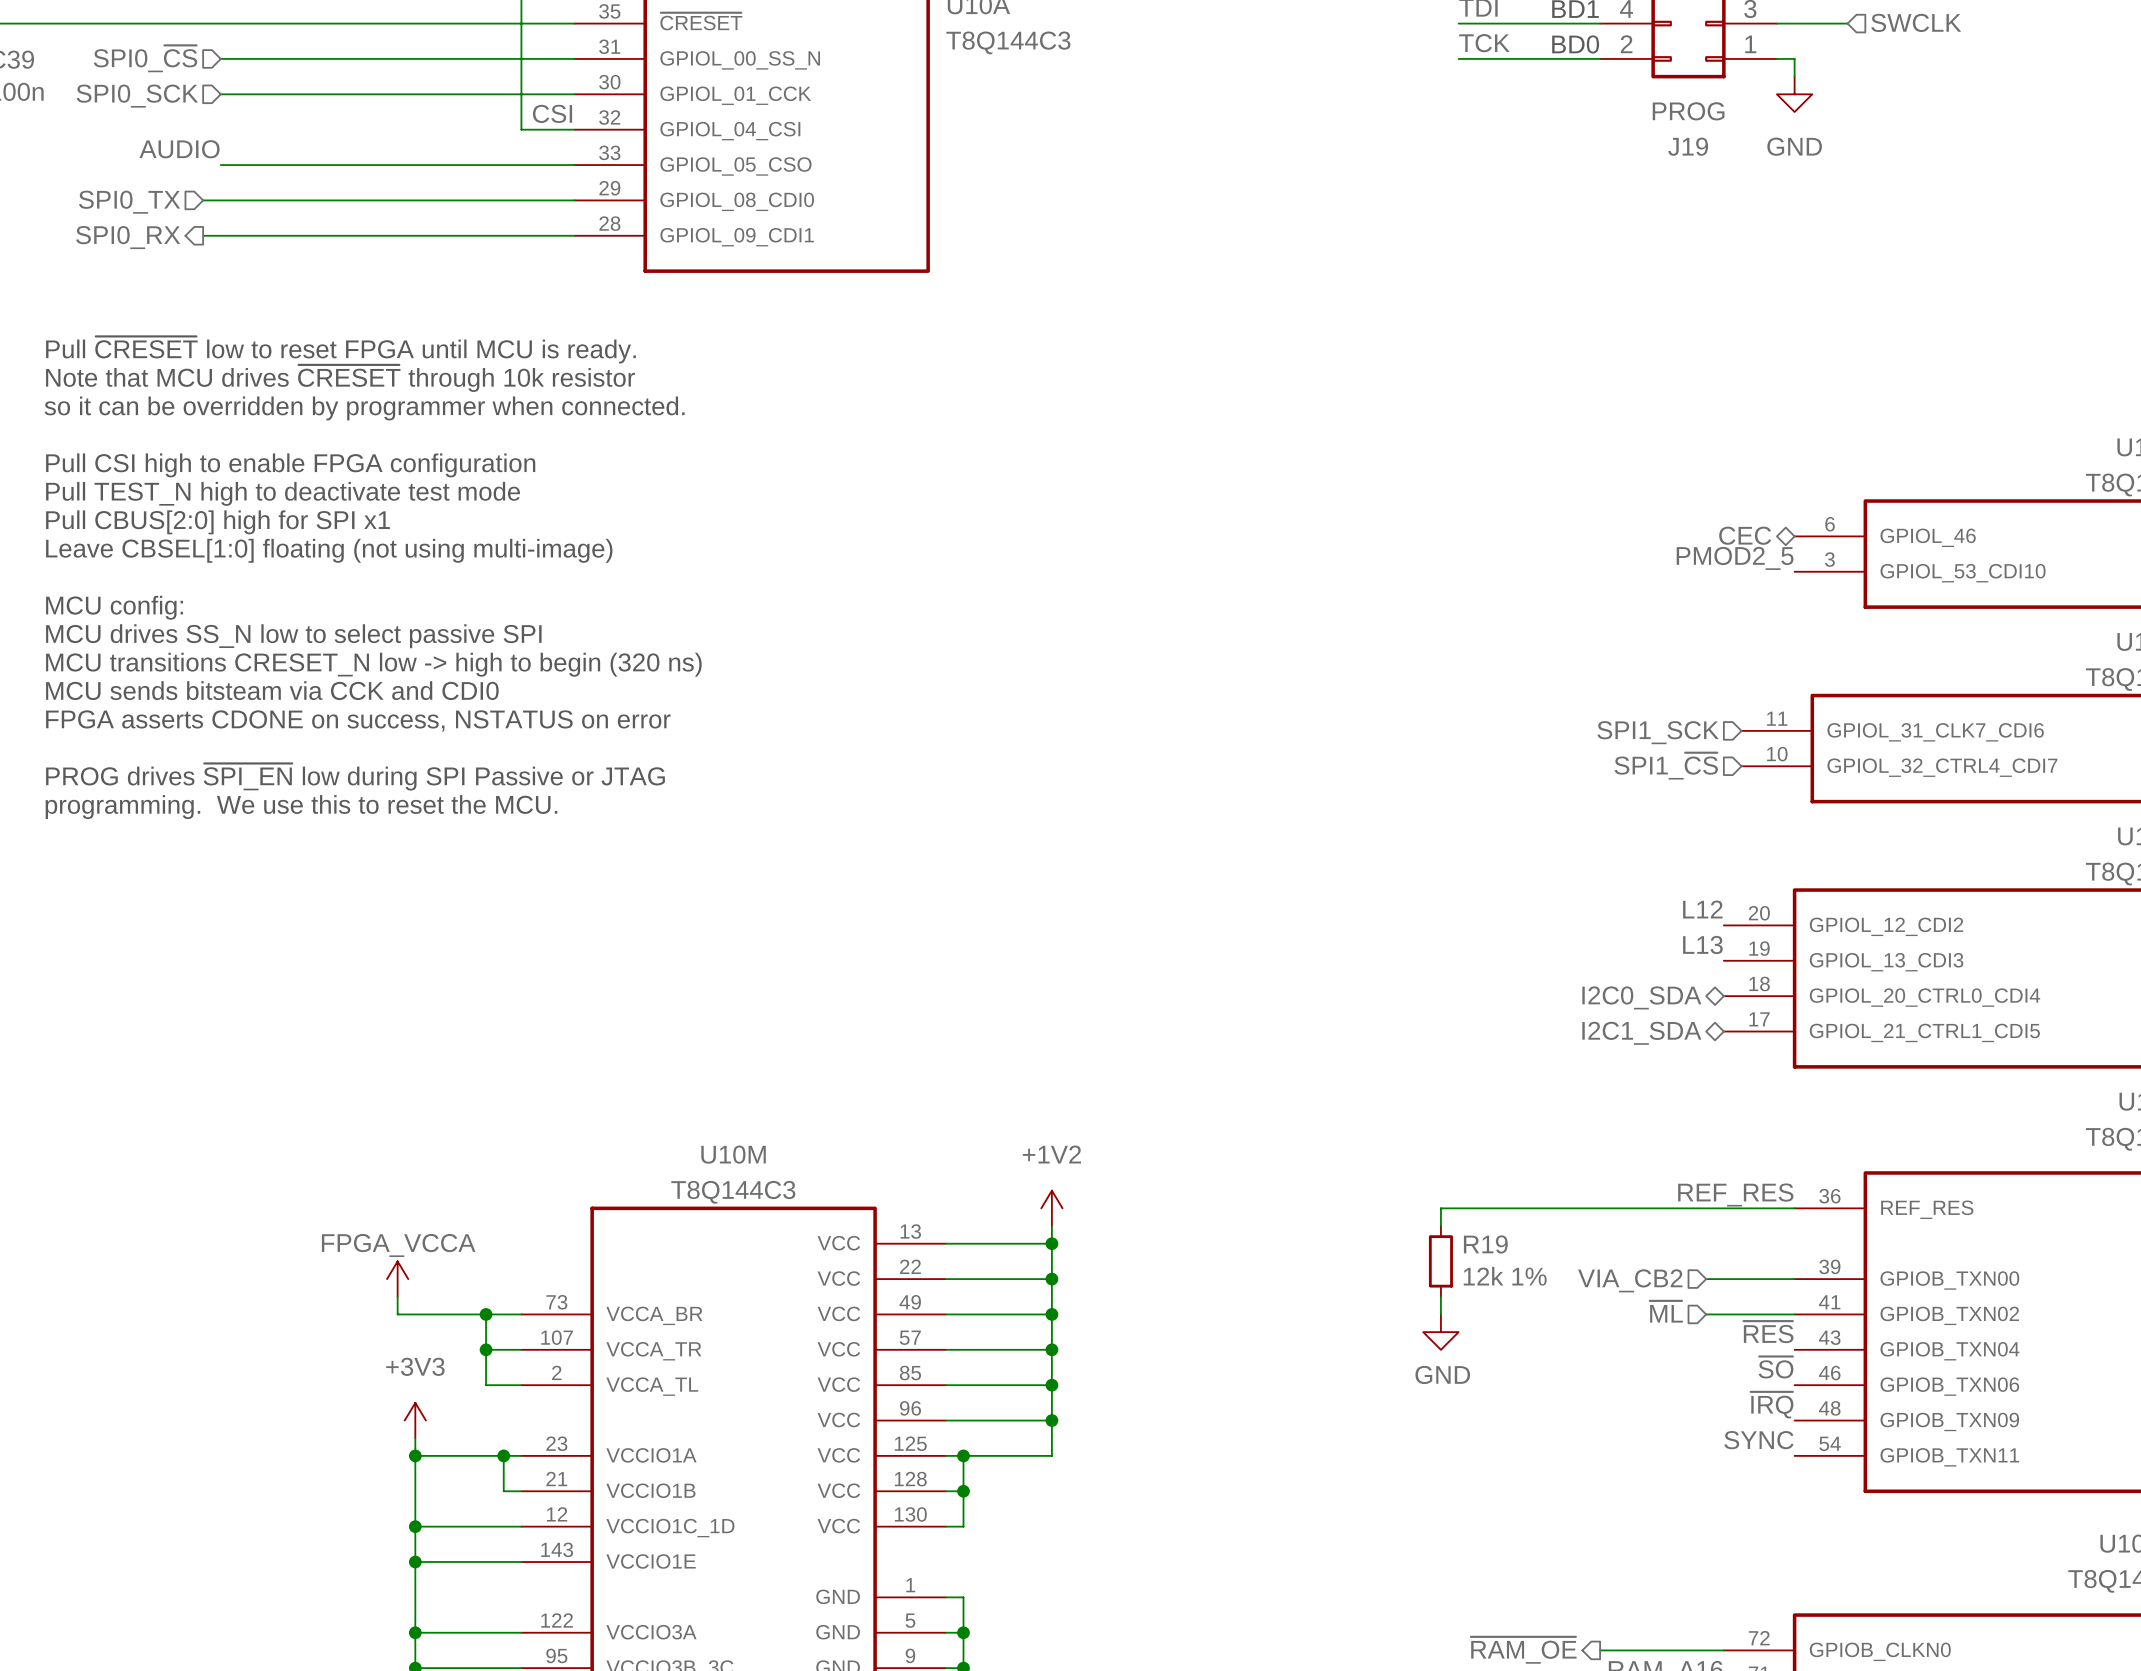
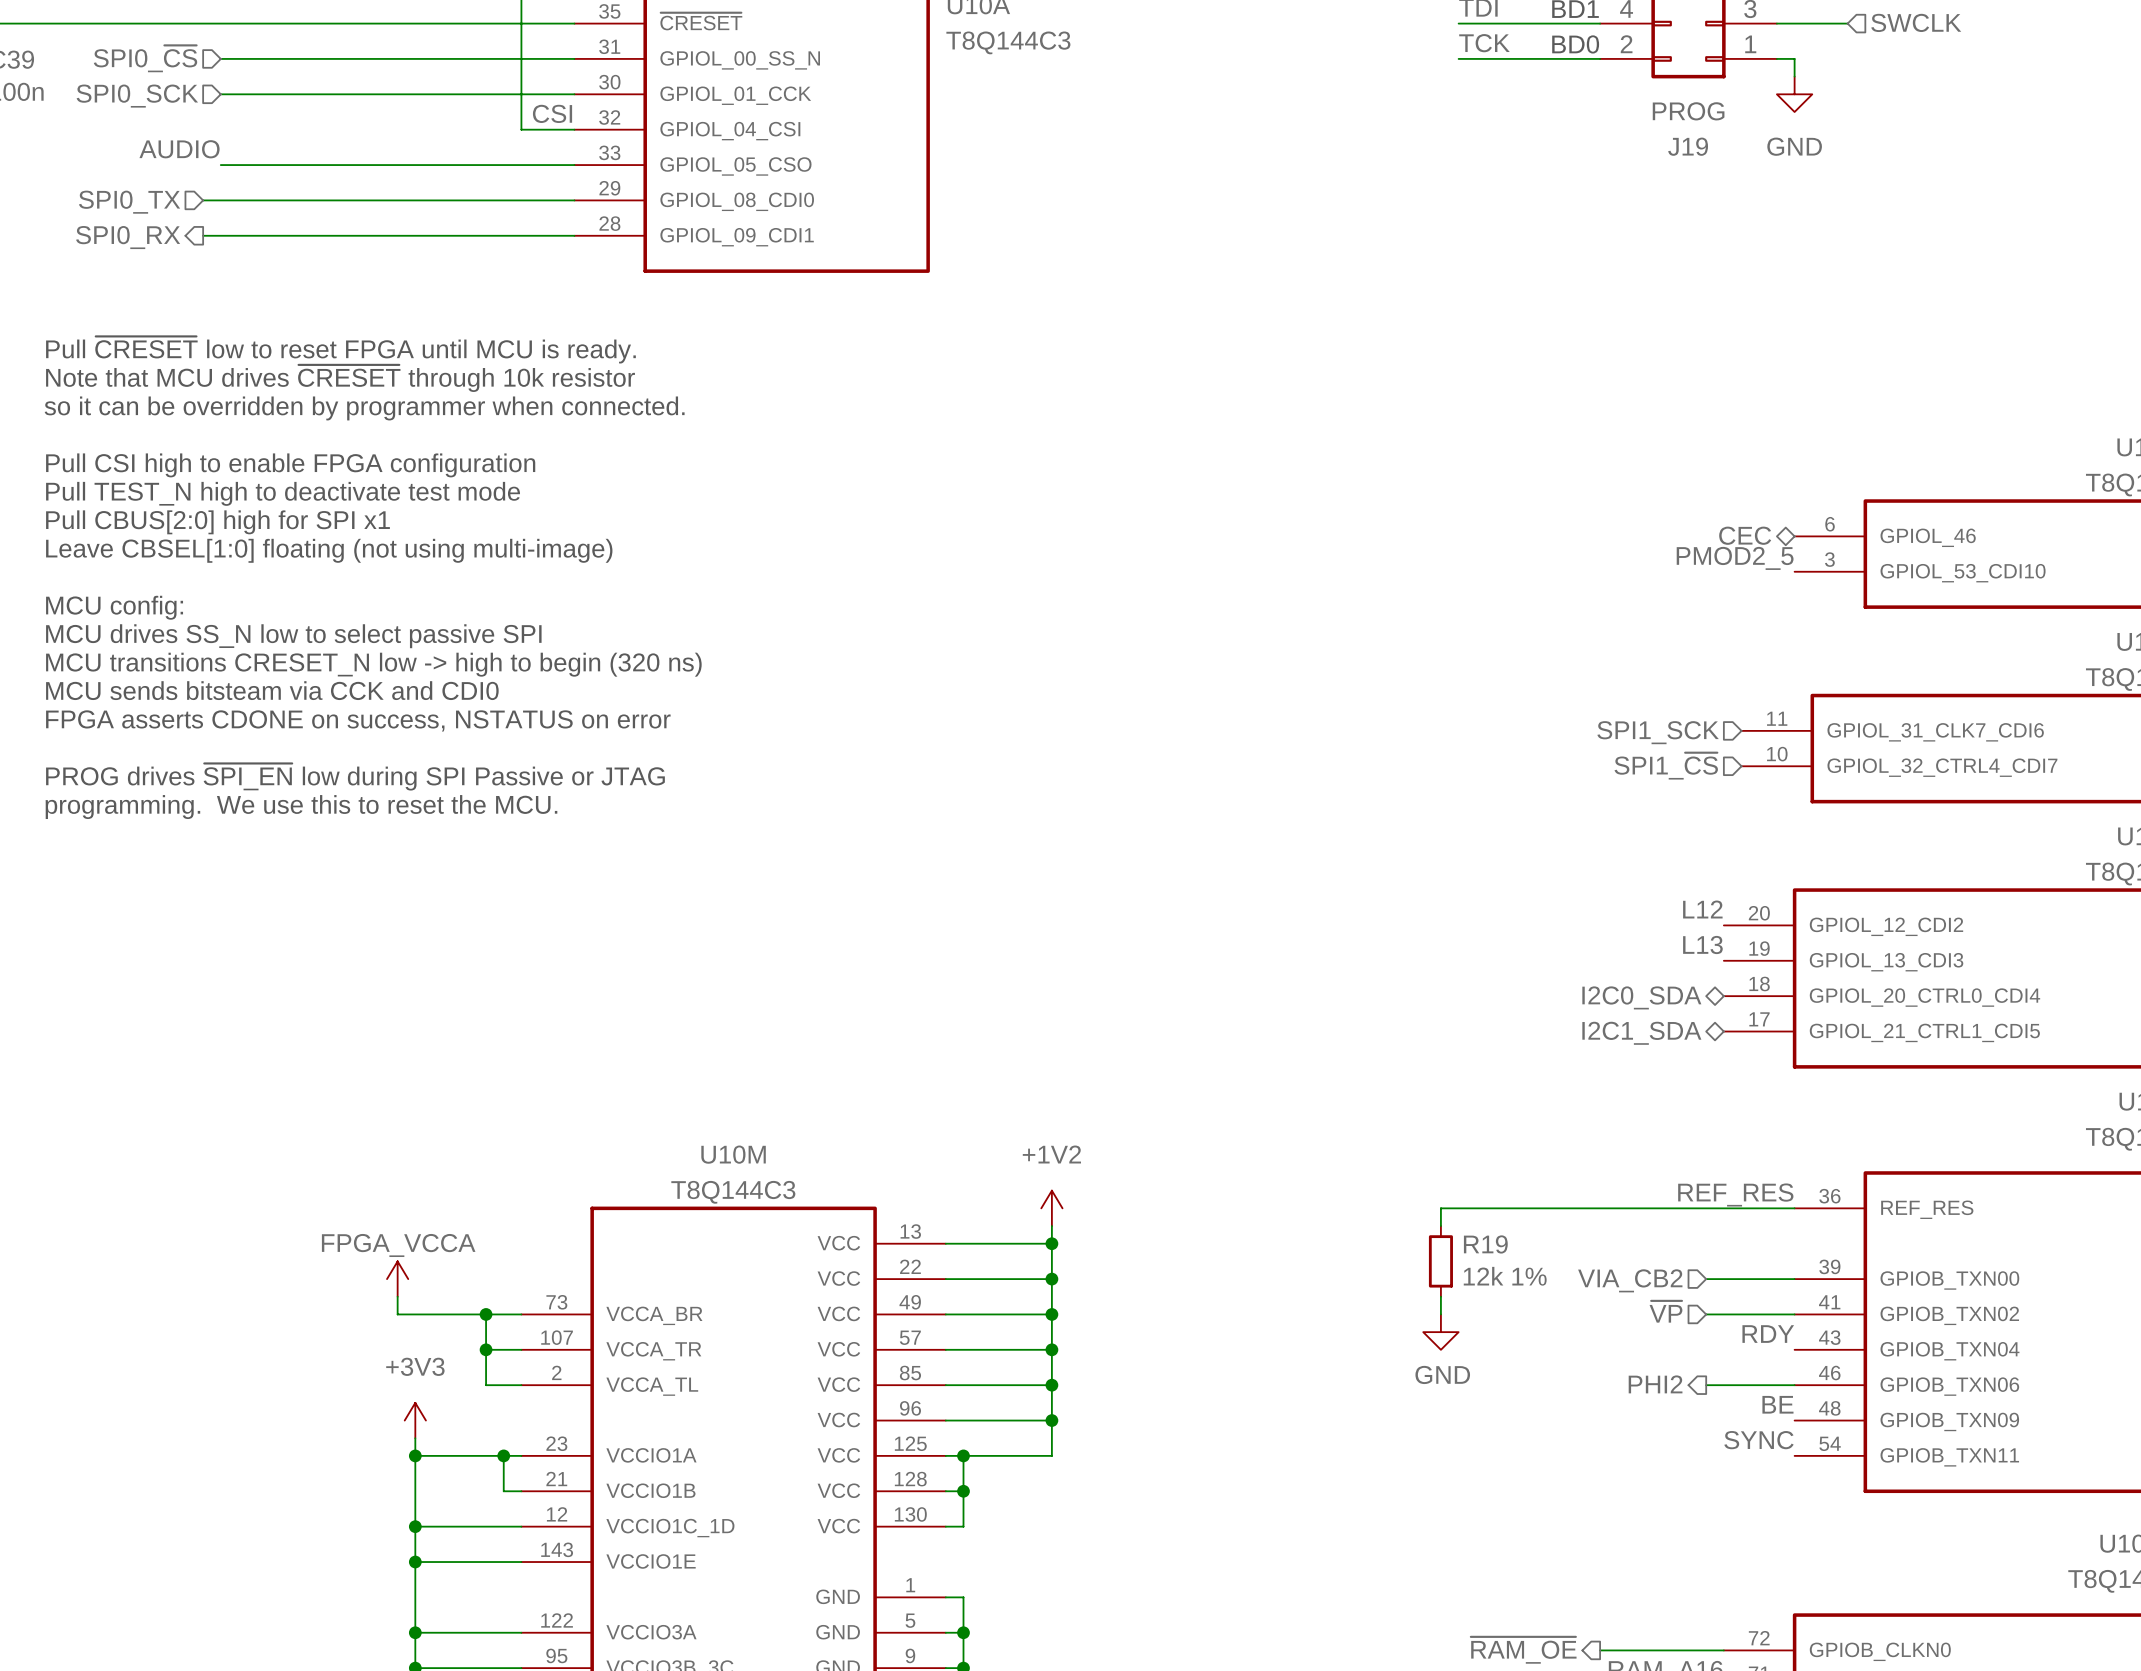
hierarchical label: ~{ML} (1666, 1311) -> ~{VP} (1665, 1311)
label: ~{RES} (1768, 1332) -> RDY (1768, 1334)
label: ~{SO} (1776, 1367) -> none
hierarchical label: none -> PHI2 (1655, 1384)
wire: none -> (1706, 1385) (1794, 1385)
label: ~{IRQ} (1772, 1405) -> BE (1777, 1404)

